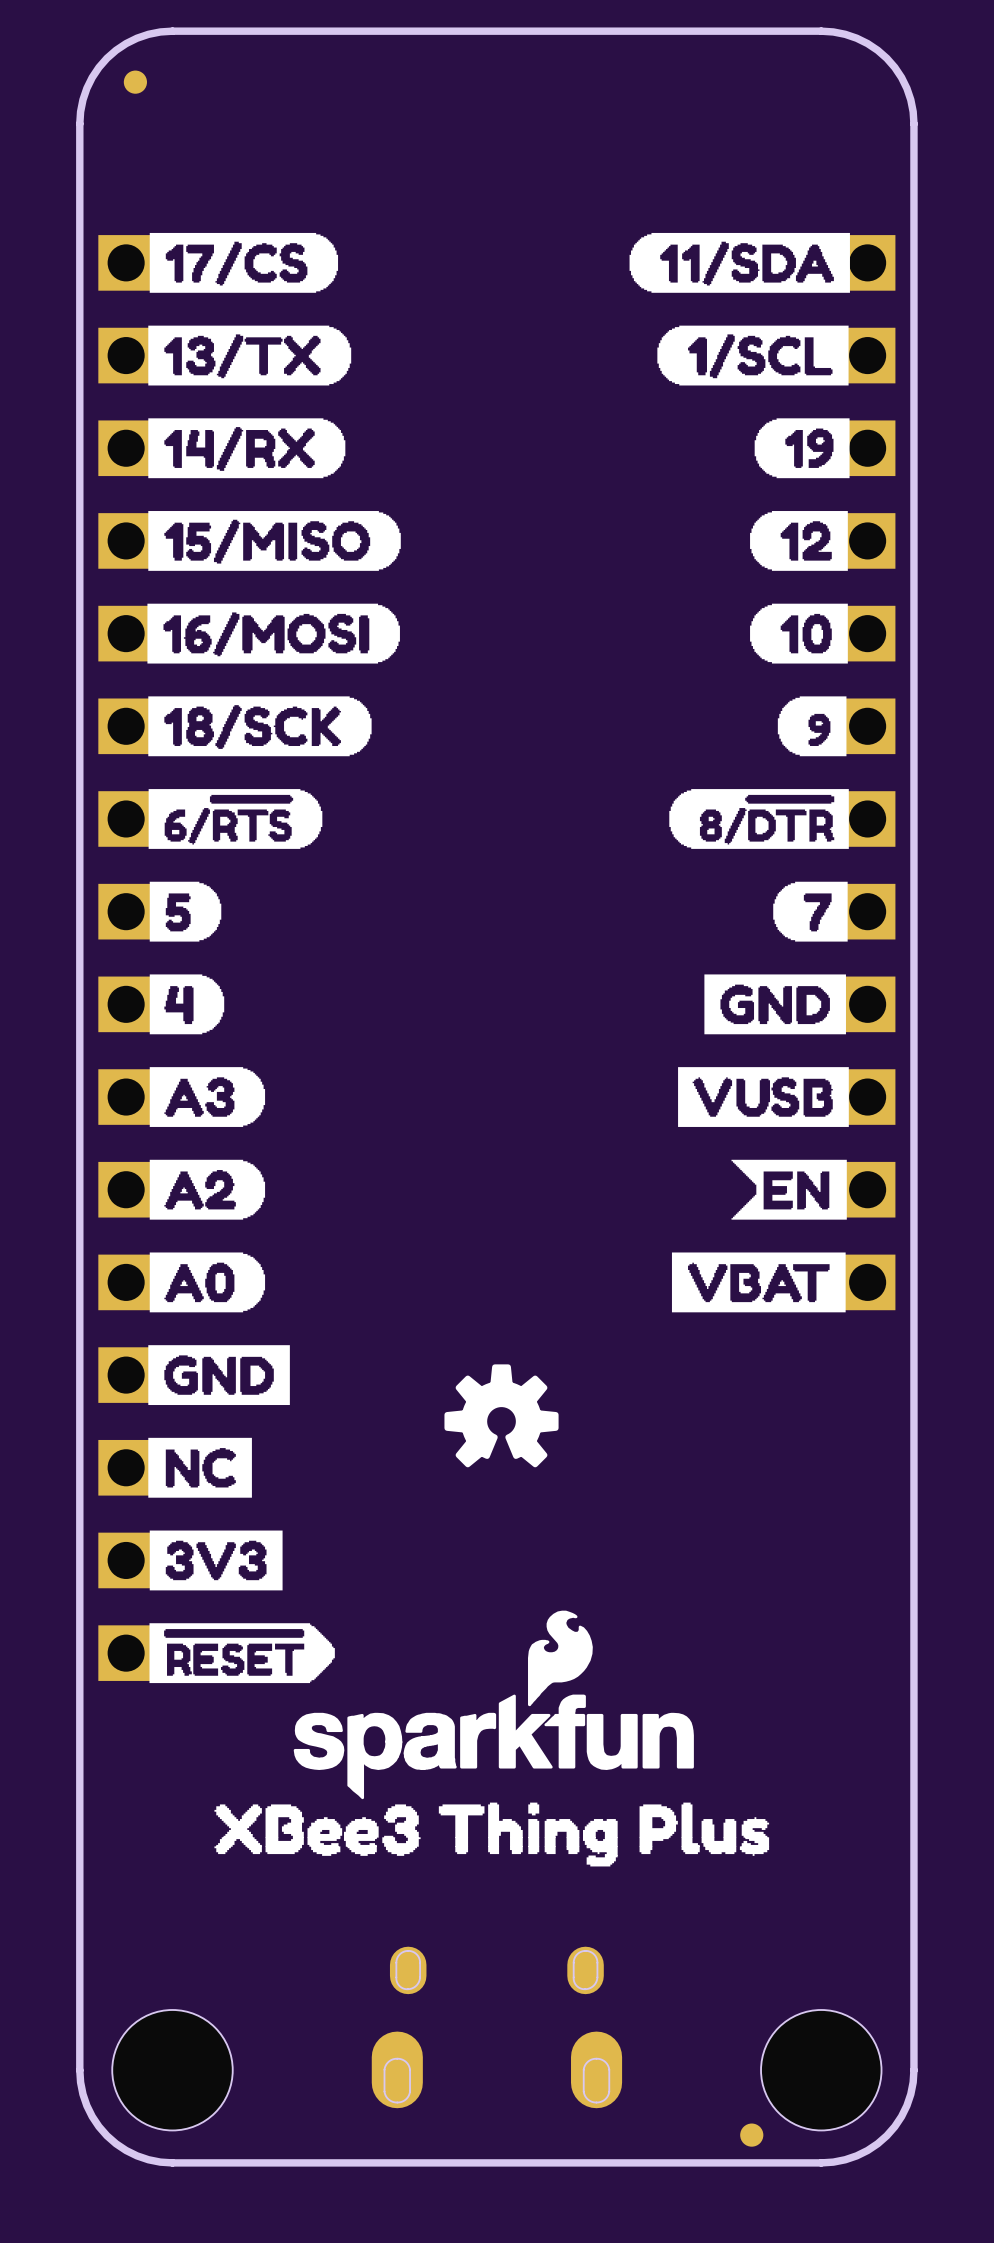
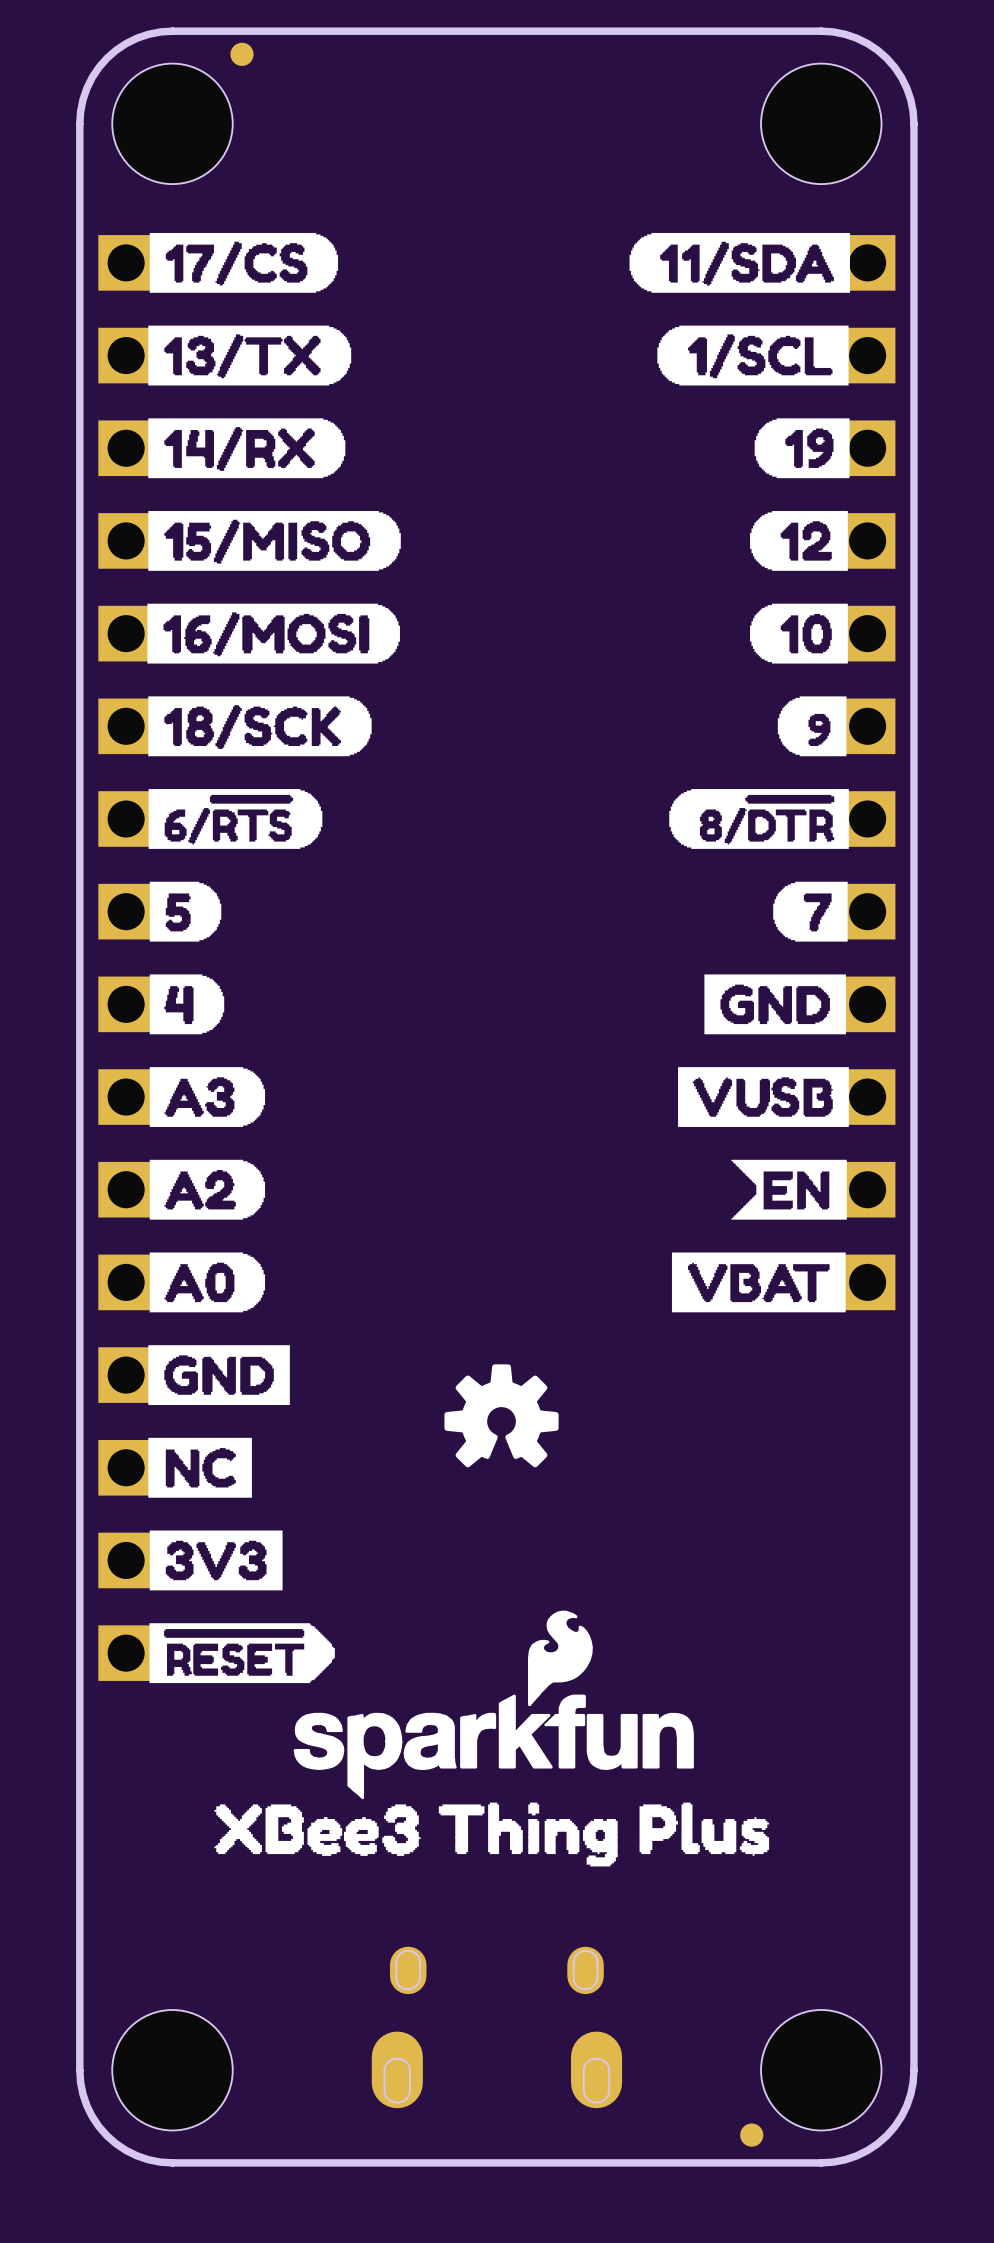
part position: (135, 82) -> (242, 54)
part: none -> (172, 123)
part: none -> (821, 123)

